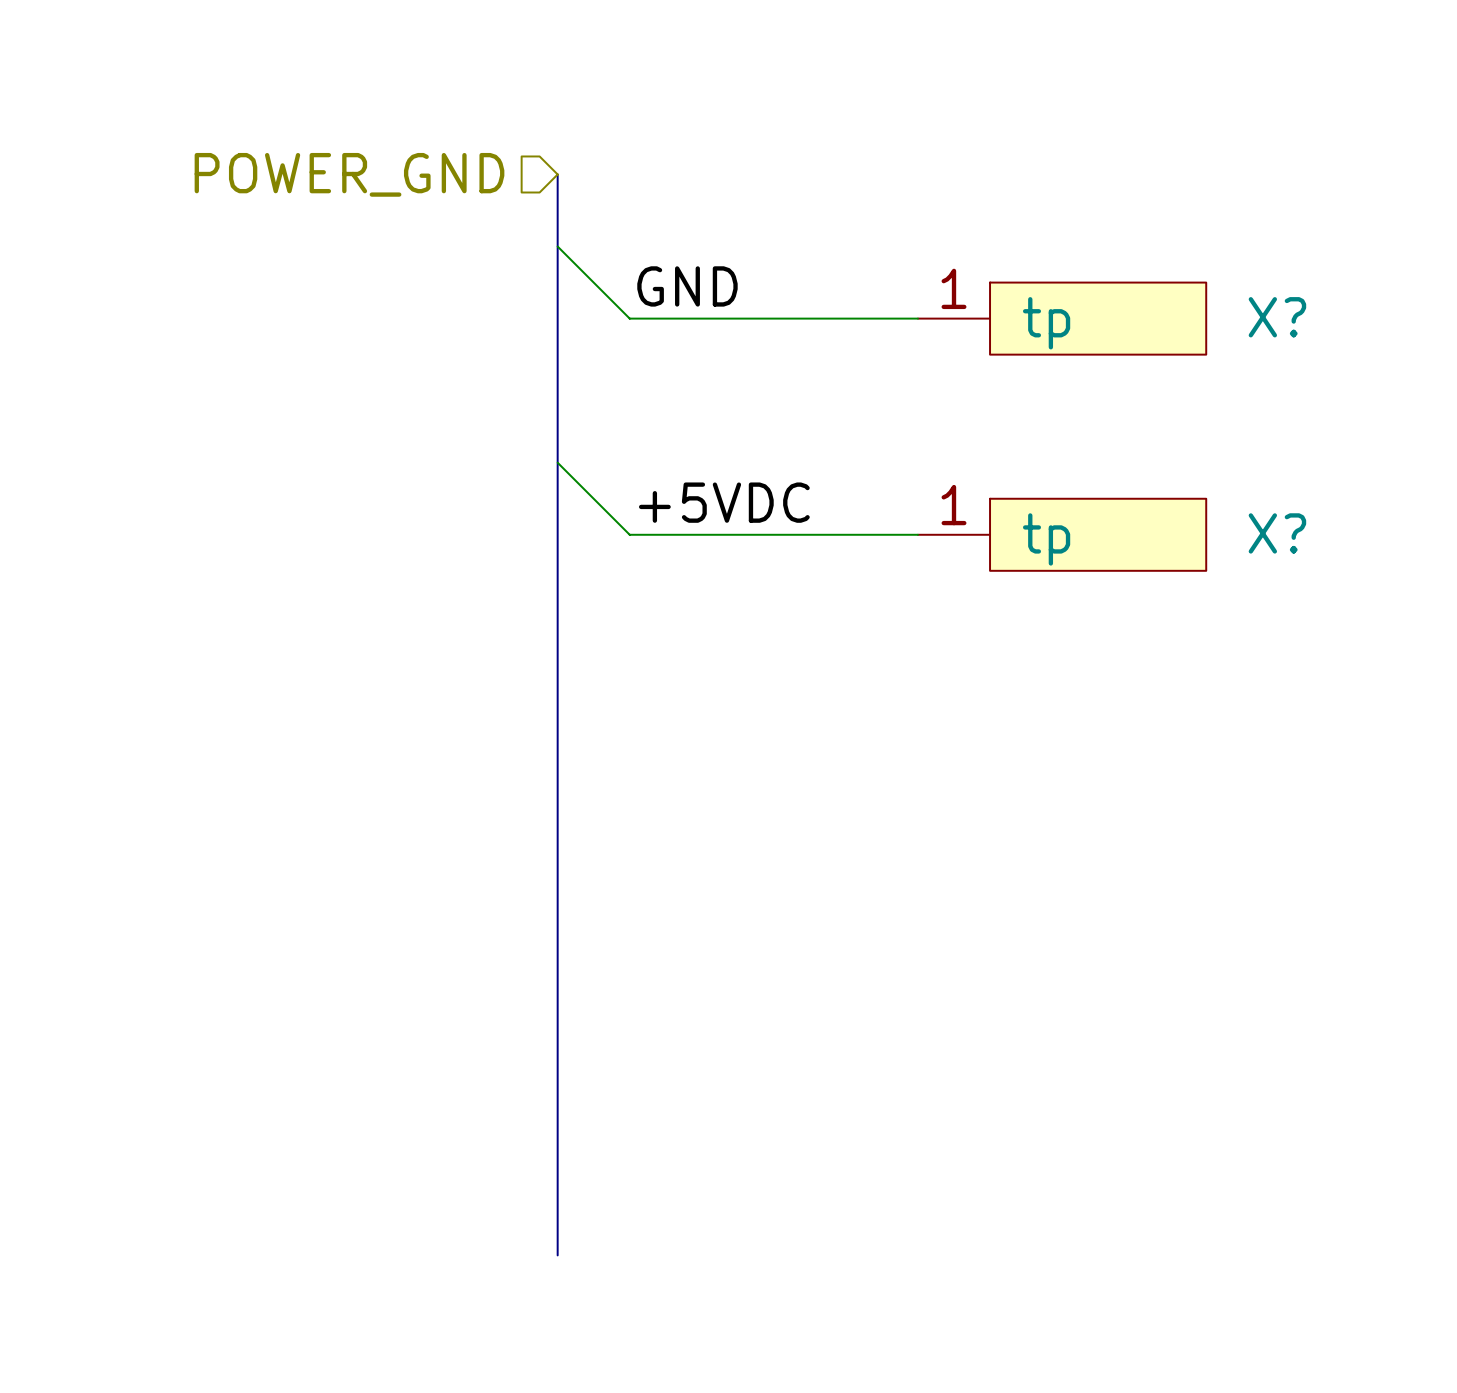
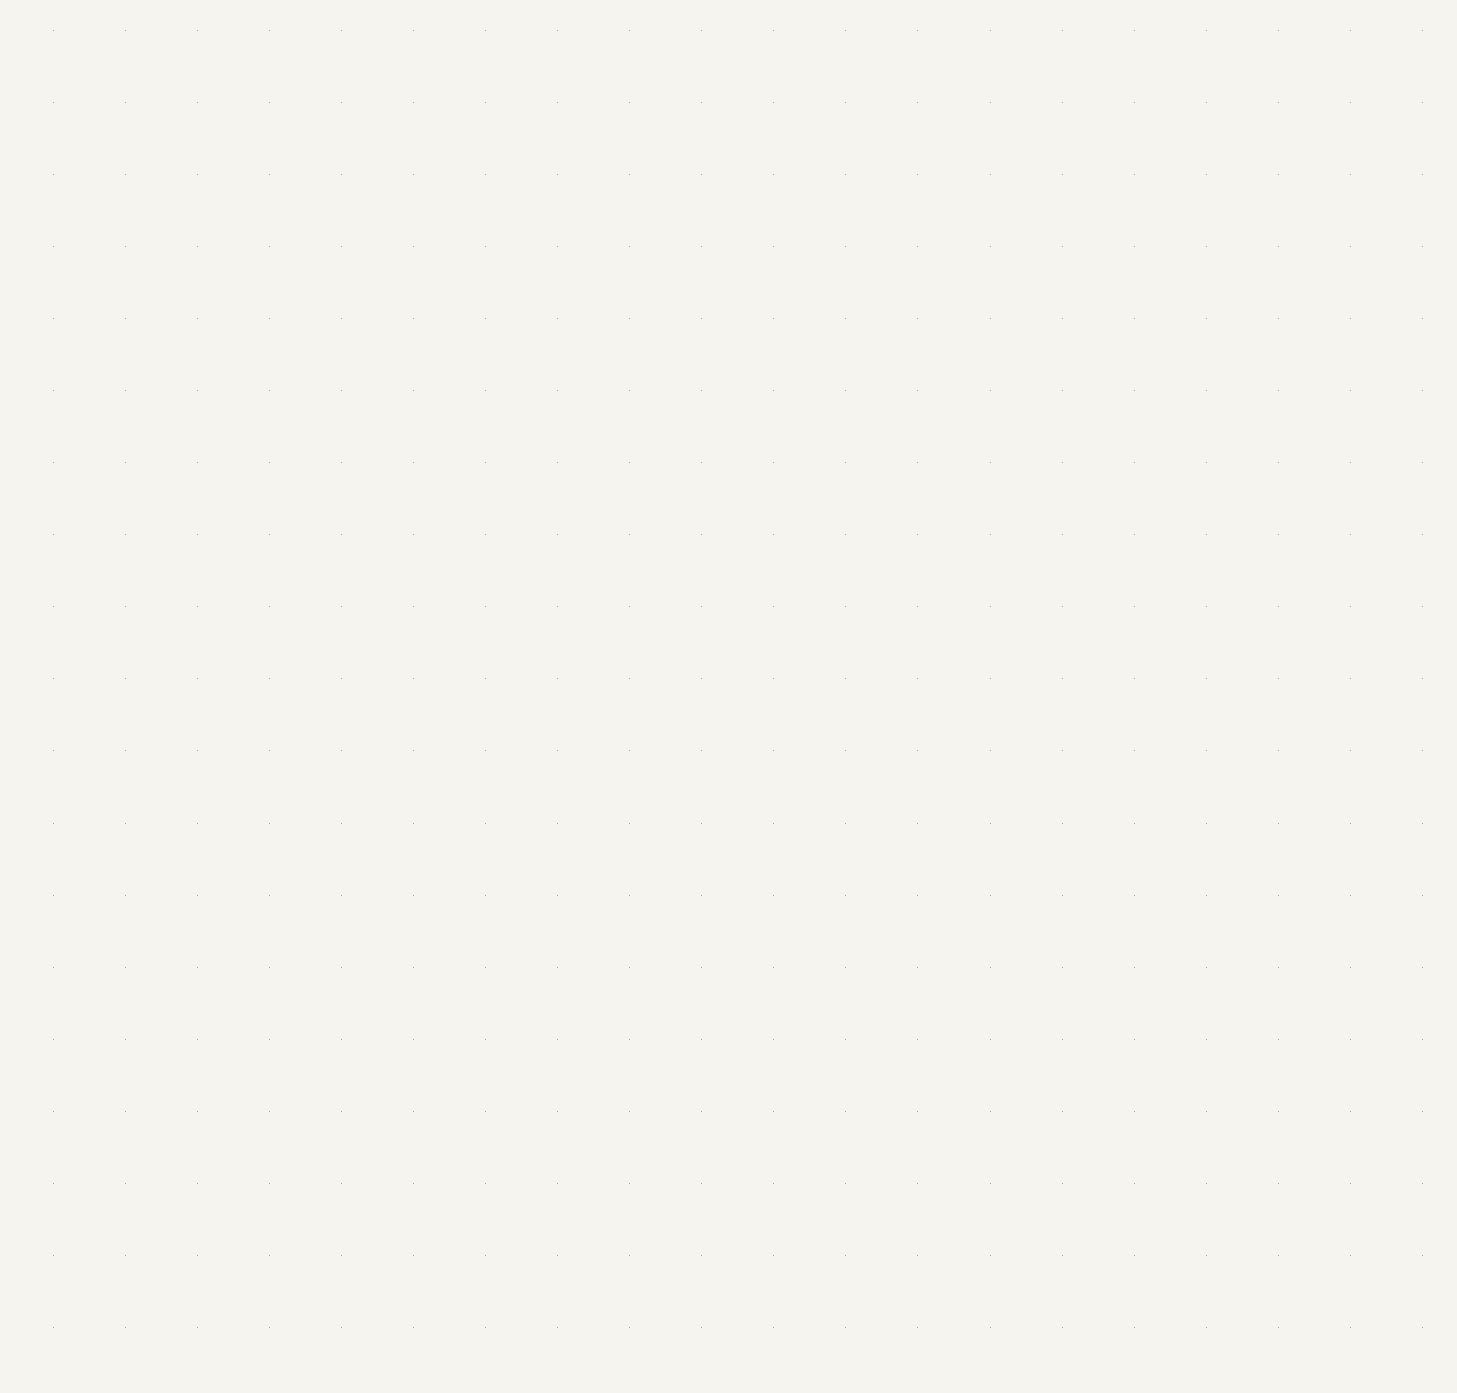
hierarchical label: POWER_GND (349, 174) -> none
bus: (557, 174) (557, 1255) -> none
wire: (557, 246) (629, 318) (917, 318) -> none
label: GND (687, 286) -> none
X?: (1062, 318) -> none
wire: (557, 462) (629, 534) (917, 534) -> none
label: +5VDC (724, 502) -> none
X?: (1062, 534) -> none

